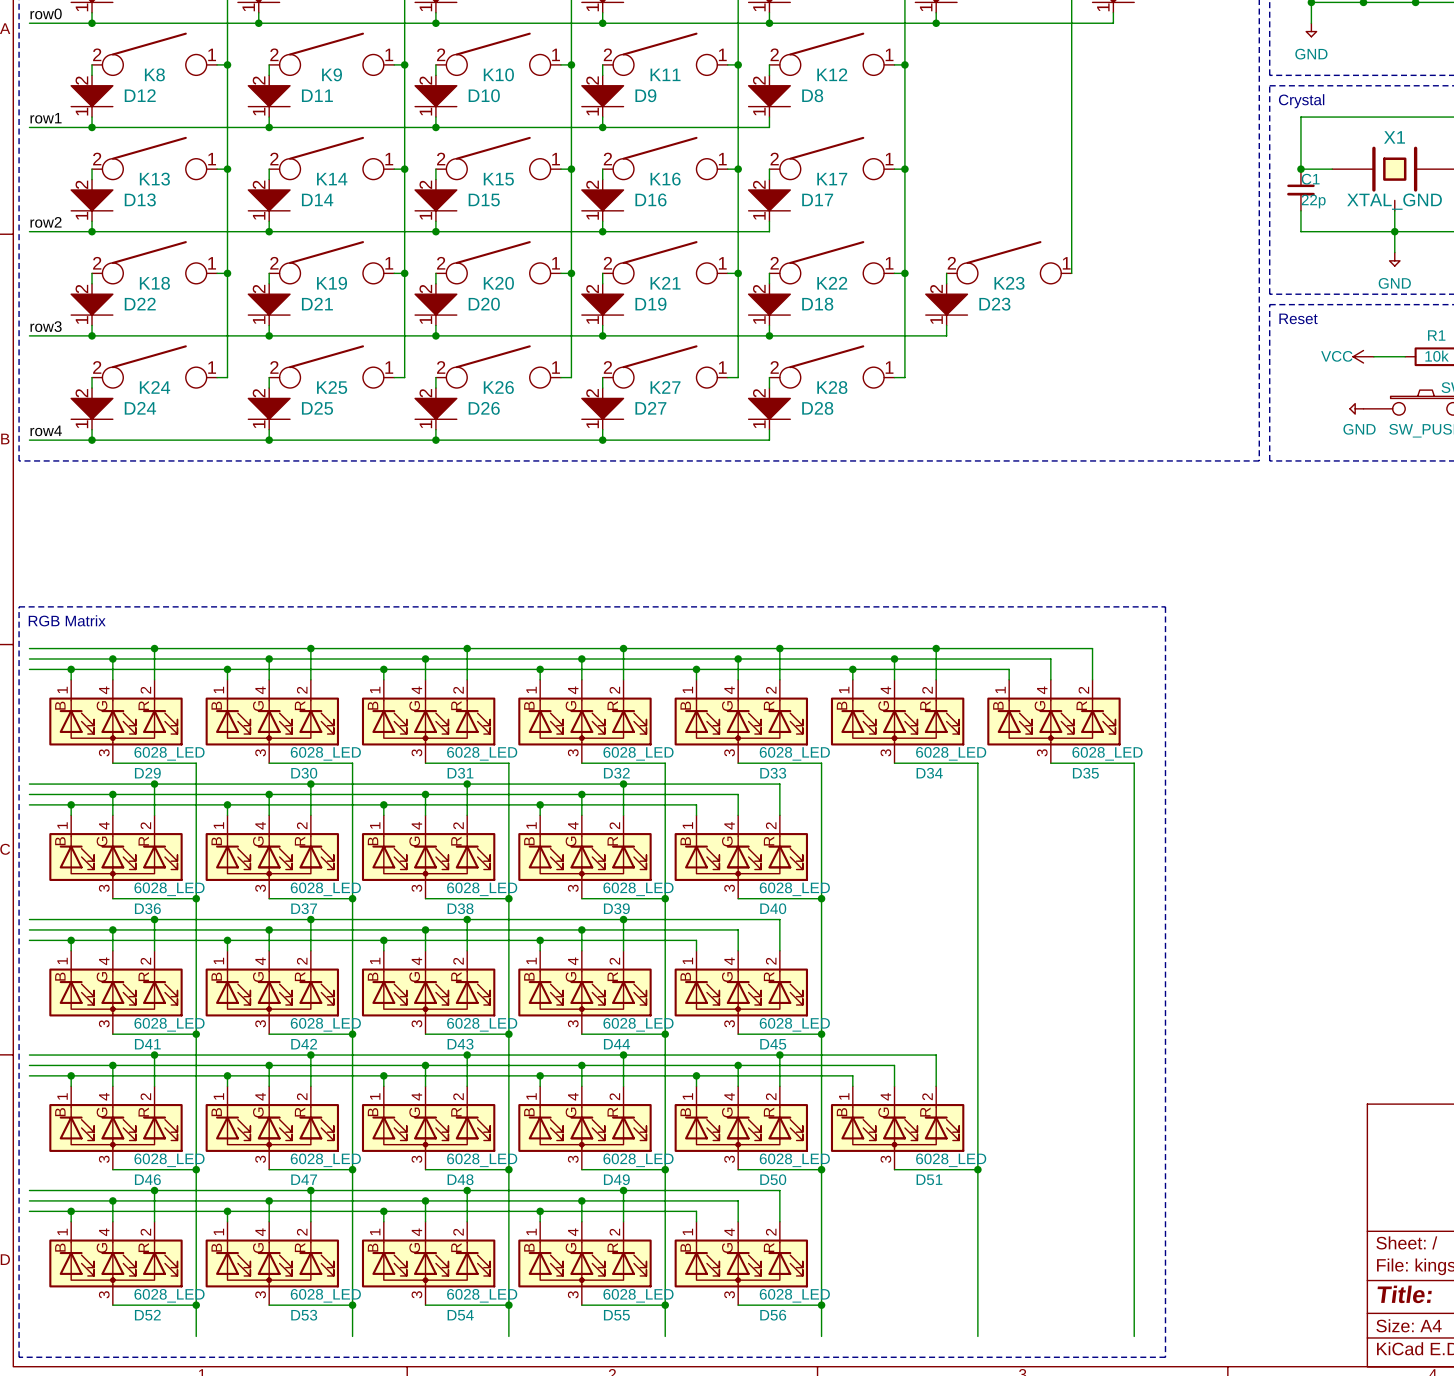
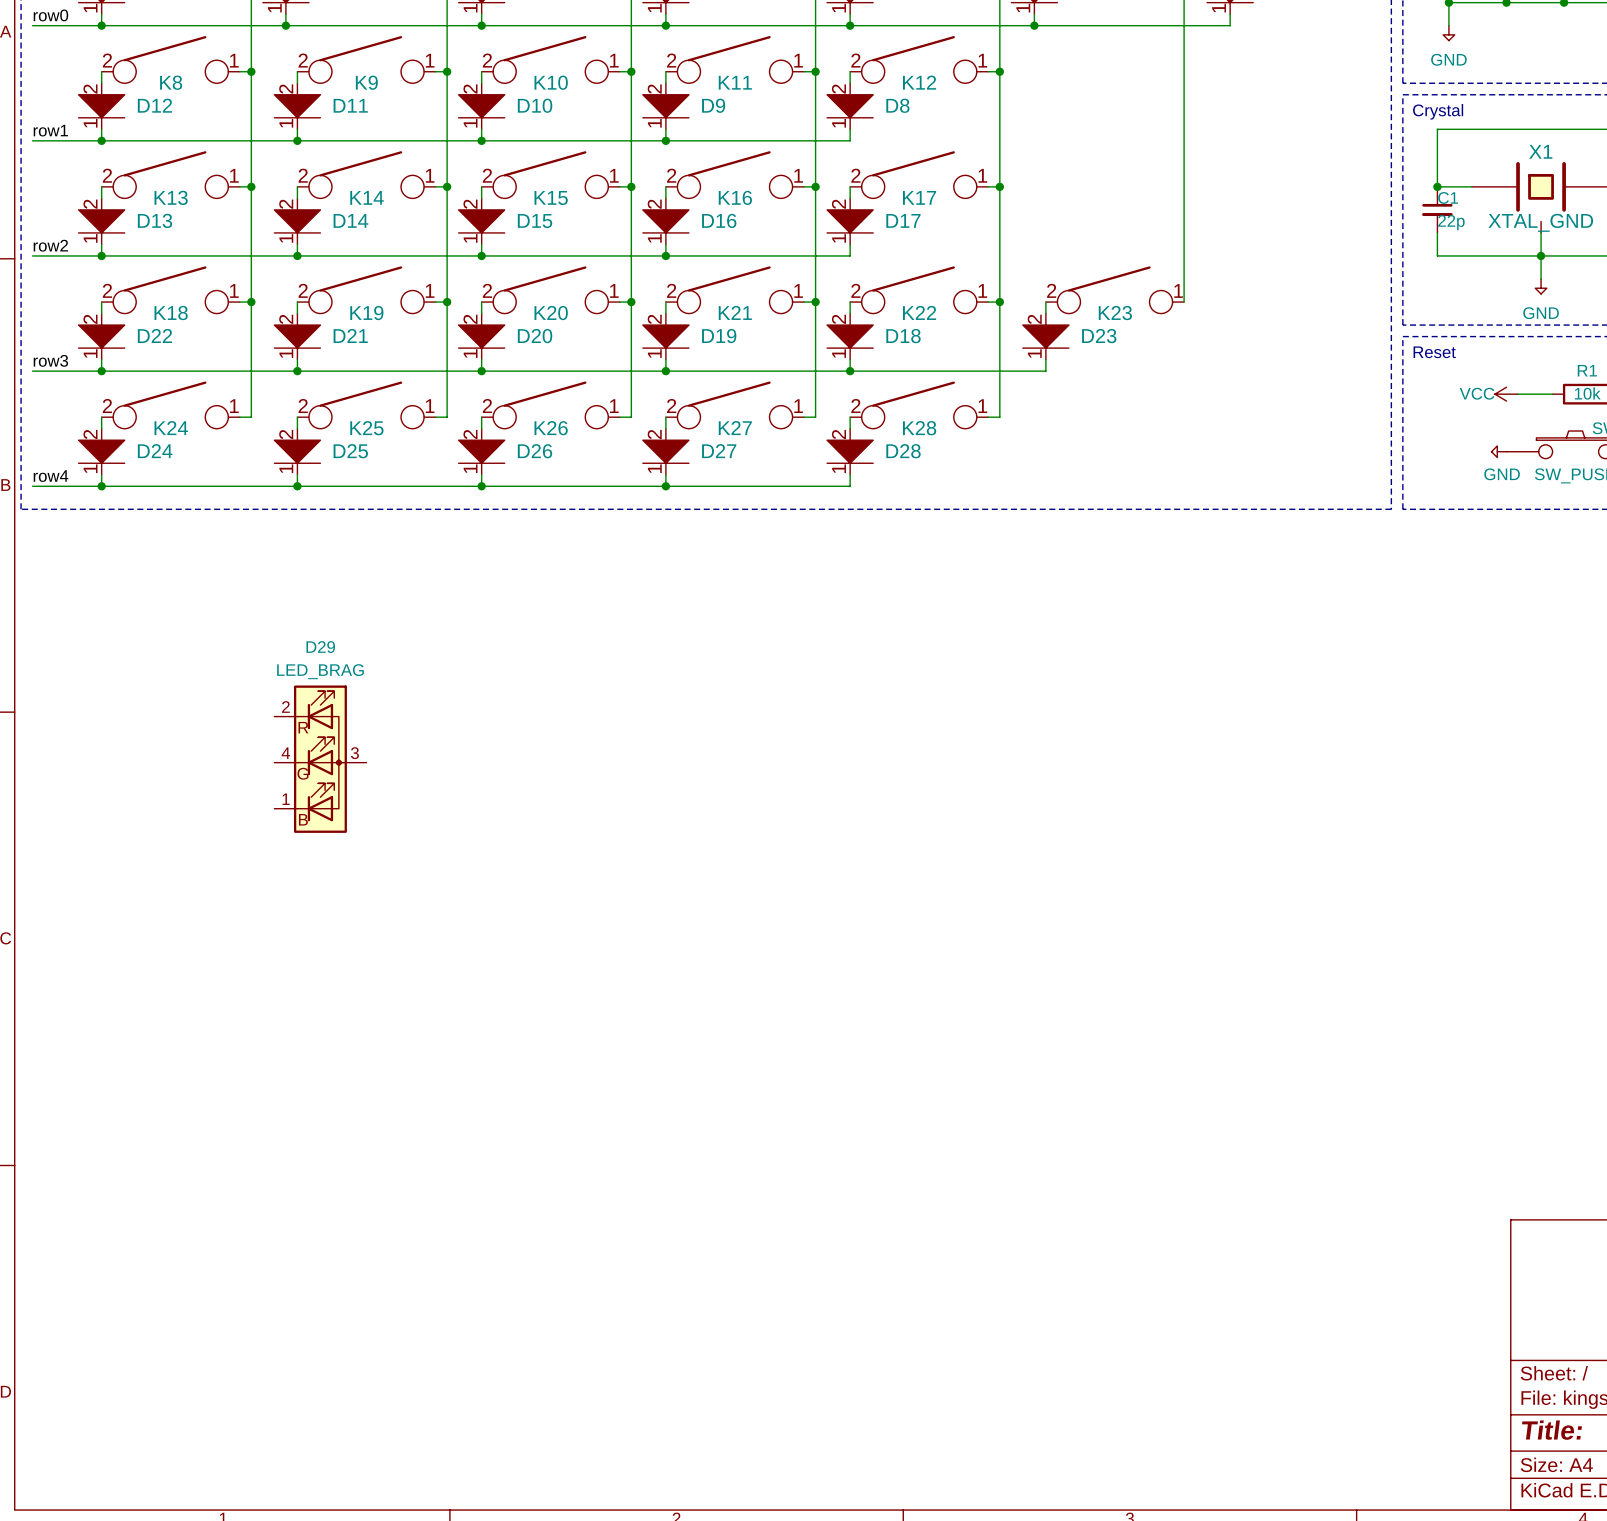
line: (19, 606) (1165, 606) (1165, 1357) (19, 1357) (19, 606) -> none
text: RGB Matrix (67, 620) -> none
wire: (29, 648) (1092, 648) (1092, 679) -> none
wire: (154, 648) (154, 679) -> none
junction: (154, 648) -> none
junction: (310, 648) -> none
wire: (467, 648) (467, 679) -> none
junction: (467, 648) -> none
wire: (623, 648) (623, 679) -> none
junction: (623, 648) -> none
wire: (779, 648) (779, 679) -> none
junction: (779, 648) -> none
wire: (936, 648) (936, 679) -> none
junction: (936, 648) -> none
wire: (29, 658) (1050, 658) (1050, 679) -> none
wire: (112, 658) (112, 679) -> none
junction: (112, 658) -> none
junction: (269, 658) -> none
wire: (425, 658) (425, 679) -> none
junction: (425, 658) -> none
wire: (581, 658) (581, 679) -> none
junction: (581, 658) -> none
wire: (738, 658) (738, 679) -> none
junction: (738, 658) -> none
wire: (894, 658) (894, 679) -> none
junction: (894, 658) -> none
wire: (29, 669) (1009, 669) (1009, 679) -> none
wire: (71, 669) (71, 679) -> none
junction: (71, 669) -> none
wire: (227, 669) (227, 679) -> none
junction: (227, 669) -> none
wire: (383, 669) (383, 679) -> none
junction: (383, 669) -> none
wire: (540, 669) (540, 679) -> none
junction: (540, 669) -> none
wire: (696, 669) (696, 679) -> none
junction: (696, 669) -> none
wire: (852, 669) (852, 679) -> none
junction: (852, 669) -> none
D29 rotation: 0° (115, 721) -> 90° counterclockwise (320, 759)
D29 position: (115, 721) -> (320, 759)
D30: 6028_LED (272, 721) -> none
D31: 6028_LED (428, 721) -> none
D32: 6028_LED (584, 721) -> none
D33: 6028_LED (741, 721) -> none
D34: 6028_LED (897, 721) -> none
D35: 6028_LED (1053, 721) -> none
D29 value: 6028_LED (169, 753) -> LED_BRAG (320, 671)
wire: (112, 763) (196, 763) (196, 1336) -> none
wire: (269, 763) (352, 763) (352, 1336) -> none
wire: (425, 763) (508, 763) (508, 1336) -> none
wire: (581, 763) (665, 763) (665, 1336) -> none
wire: (738, 763) (821, 763) (821, 1336) -> none
wire: (894, 763) (977, 763) (977, 1336) -> none
wire: (1050, 763) (1134, 763) (1134, 1336) -> none
D29 name position: D29 (147, 773) -> D29 (320, 647)
wire: (29, 784) (779, 784) (779, 815) -> none
wire: (154, 784) (154, 815) -> none
junction: (154, 784) -> none
wire: (310, 784) (310, 815) -> none
junction: (310, 784) -> none
wire: (467, 784) (467, 815) -> none
junction: (467, 784) -> none
wire: (623, 784) (623, 815) -> none
junction: (623, 784) -> none
wire: (29, 794) (738, 794) (738, 815) -> none
wire: (112, 794) (112, 815) -> none
junction: (112, 794) -> none
wire: (269, 794) (269, 815) -> none
junction: (269, 794) -> none
wire: (425, 794) (425, 815) -> none
junction: (425, 794) -> none
wire: (581, 794) (581, 815) -> none
junction: (581, 794) -> none
wire: (29, 804) (696, 804) (696, 815) -> none
wire: (71, 804) (71, 815) -> none
junction: (71, 804) -> none
wire: (227, 804) (227, 815) -> none
junction: (227, 804) -> none
wire: (383, 804) (383, 815) -> none
junction: (383, 804) -> none
wire: (540, 804) (540, 815) -> none
junction: (540, 804) -> none
D36: 6028_LED (115, 857) -> none
D37: 6028_LED (272, 857) -> none
D38: 6028_LED (428, 857) -> none
D39: 6028_LED (584, 857) -> none
D40: 6028_LED (741, 857) -> none
wire: (112, 898) (196, 898) -> none
junction: (196, 898) -> none
wire: (269, 898) (352, 898) -> none
junction: (352, 898) -> none
wire: (425, 898) (508, 898) -> none
junction: (508, 898) -> none
wire: (581, 898) (665, 898) -> none
junction: (665, 898) -> none
wire: (738, 898) (821, 898) -> none
junction: (821, 898) -> none
wire: (29, 919) (779, 919) (779, 950) -> none
wire: (154, 919) (154, 950) -> none
junction: (154, 919) -> none
wire: (310, 919) (310, 950) -> none
junction: (310, 919) -> none
wire: (467, 919) (467, 950) -> none
junction: (467, 919) -> none
wire: (623, 919) (623, 950) -> none
junction: (623, 919) -> none
wire: (29, 929) (738, 929) (738, 950) -> none
wire: (112, 929) (112, 950) -> none
junction: (112, 929) -> none
wire: (269, 929) (269, 950) -> none
junction: (269, 929) -> none
wire: (425, 929) (425, 950) -> none
junction: (425, 929) -> none
wire: (581, 929) (581, 950) -> none
junction: (581, 929) -> none
wire: (29, 940) (696, 940) (696, 950) -> none
wire: (71, 940) (71, 950) -> none
junction: (71, 940) -> none
wire: (227, 940) (227, 950) -> none
junction: (227, 940) -> none
wire: (383, 940) (383, 950) -> none
junction: (383, 940) -> none
wire: (540, 940) (540, 950) -> none
junction: (540, 940) -> none
D41: 6028_LED (115, 992) -> none
D42: 6028_LED (272, 992) -> none
D43: 6028_LED (428, 992) -> none
D44: 6028_LED (584, 992) -> none
D45: 6028_LED (741, 992) -> none
wire: (112, 1034) (196, 1034) -> none
junction: (196, 1034) -> none
wire: (269, 1034) (352, 1034) -> none
junction: (352, 1034) -> none
wire: (425, 1034) (508, 1034) -> none
junction: (508, 1034) -> none
wire: (581, 1034) (665, 1034) -> none
junction: (665, 1034) -> none
wire: (738, 1034) (821, 1034) -> none
junction: (821, 1034) -> none
wire: (29, 1055) (936, 1055) (936, 1086) -> none
wire: (154, 1055) (154, 1086) -> none
junction: (154, 1055) -> none
wire: (310, 1055) (310, 1086) -> none
junction: (310, 1055) -> none
wire: (467, 1055) (467, 1086) -> none
junction: (467, 1055) -> none
wire: (623, 1055) (623, 1086) -> none
junction: (623, 1055) -> none
wire: (779, 1055) (779, 1086) -> none
junction: (779, 1055) -> none
wire: (29, 1065) (894, 1065) (894, 1086) -> none
wire: (112, 1065) (112, 1086) -> none
junction: (112, 1065) -> none
wire: (269, 1065) (269, 1086) -> none
junction: (269, 1065) -> none
wire: (425, 1065) (425, 1086) -> none
junction: (425, 1065) -> none
wire: (581, 1065) (581, 1086) -> none
junction: (581, 1065) -> none
wire: (738, 1065) (738, 1086) -> none
junction: (738, 1065) -> none
wire: (29, 1075) (852, 1075) (852, 1086) -> none
wire: (71, 1075) (71, 1086) -> none
junction: (71, 1075) -> none
wire: (227, 1075) (227, 1086) -> none
junction: (227, 1075) -> none
wire: (383, 1075) (383, 1086) -> none
junction: (383, 1075) -> none
wire: (540, 1075) (540, 1086) -> none
junction: (540, 1075) -> none
wire: (696, 1075) (696, 1086) -> none
junction: (696, 1075) -> none
D46: 6028_LED (115, 1127) -> none
D47: 6028_LED (272, 1127) -> none
D48: 6028_LED (428, 1127) -> none
D49: 6028_LED (584, 1127) -> none
D50: 6028_LED (741, 1127) -> none
D51: 6028_LED (897, 1127) -> none
wire: (112, 1169) (196, 1169) -> none
junction: (196, 1169) -> none
wire: (269, 1169) (352, 1169) -> none
junction: (352, 1169) -> none
wire: (425, 1169) (508, 1169) -> none
junction: (508, 1169) -> none
wire: (581, 1169) (665, 1169) -> none
junction: (665, 1169) -> none
wire: (738, 1169) (821, 1169) -> none
junction: (821, 1169) -> none
wire: (894, 1169) (977, 1169) -> none
junction: (977, 1169) -> none
wire: (29, 1190) (779, 1190) (779, 1221) -> none
wire: (154, 1190) (154, 1221) -> none
junction: (154, 1190) -> none
wire: (310, 1190) (310, 1221) -> none
junction: (310, 1190) -> none
wire: (467, 1190) (467, 1221) -> none
junction: (467, 1190) -> none
wire: (623, 1190) (623, 1221) -> none
junction: (623, 1190) -> none
wire: (29, 1200) (738, 1200) (738, 1221) -> none
wire: (112, 1200) (112, 1221) -> none
junction: (112, 1200) -> none
wire: (269, 1200) (269, 1221) -> none
junction: (269, 1200) -> none
wire: (425, 1200) (425, 1221) -> none
junction: (425, 1200) -> none
wire: (581, 1200) (581, 1221) -> none
junction: (581, 1200) -> none
wire: (29, 1211) (696, 1211) (696, 1221) -> none
wire: (71, 1211) (71, 1221) -> none
junction: (71, 1211) -> none
wire: (227, 1211) (227, 1221) -> none
junction: (227, 1211) -> none
wire: (383, 1211) (383, 1221) -> none
junction: (383, 1211) -> none
wire: (540, 1211) (540, 1221) -> none
junction: (540, 1211) -> none
D52: 6028_LED (115, 1263) -> none
D53: 6028_LED (272, 1263) -> none
D54: 6028_LED (428, 1263) -> none
D55: 6028_LED (584, 1263) -> none
D56: 6028_LED (741, 1263) -> none
wire: (112, 1305) (196, 1305) -> none
junction: (196, 1305) -> none
wire: (269, 1305) (352, 1305) -> none
junction: (352, 1305) -> none
wire: (425, 1305) (508, 1305) -> none
junction: (508, 1305) -> none
wire: (581, 1305) (665, 1305) -> none
junction: (665, 1305) -> none
wire: (738, 1305) (821, 1305) -> none
junction: (821, 1305) -> none

